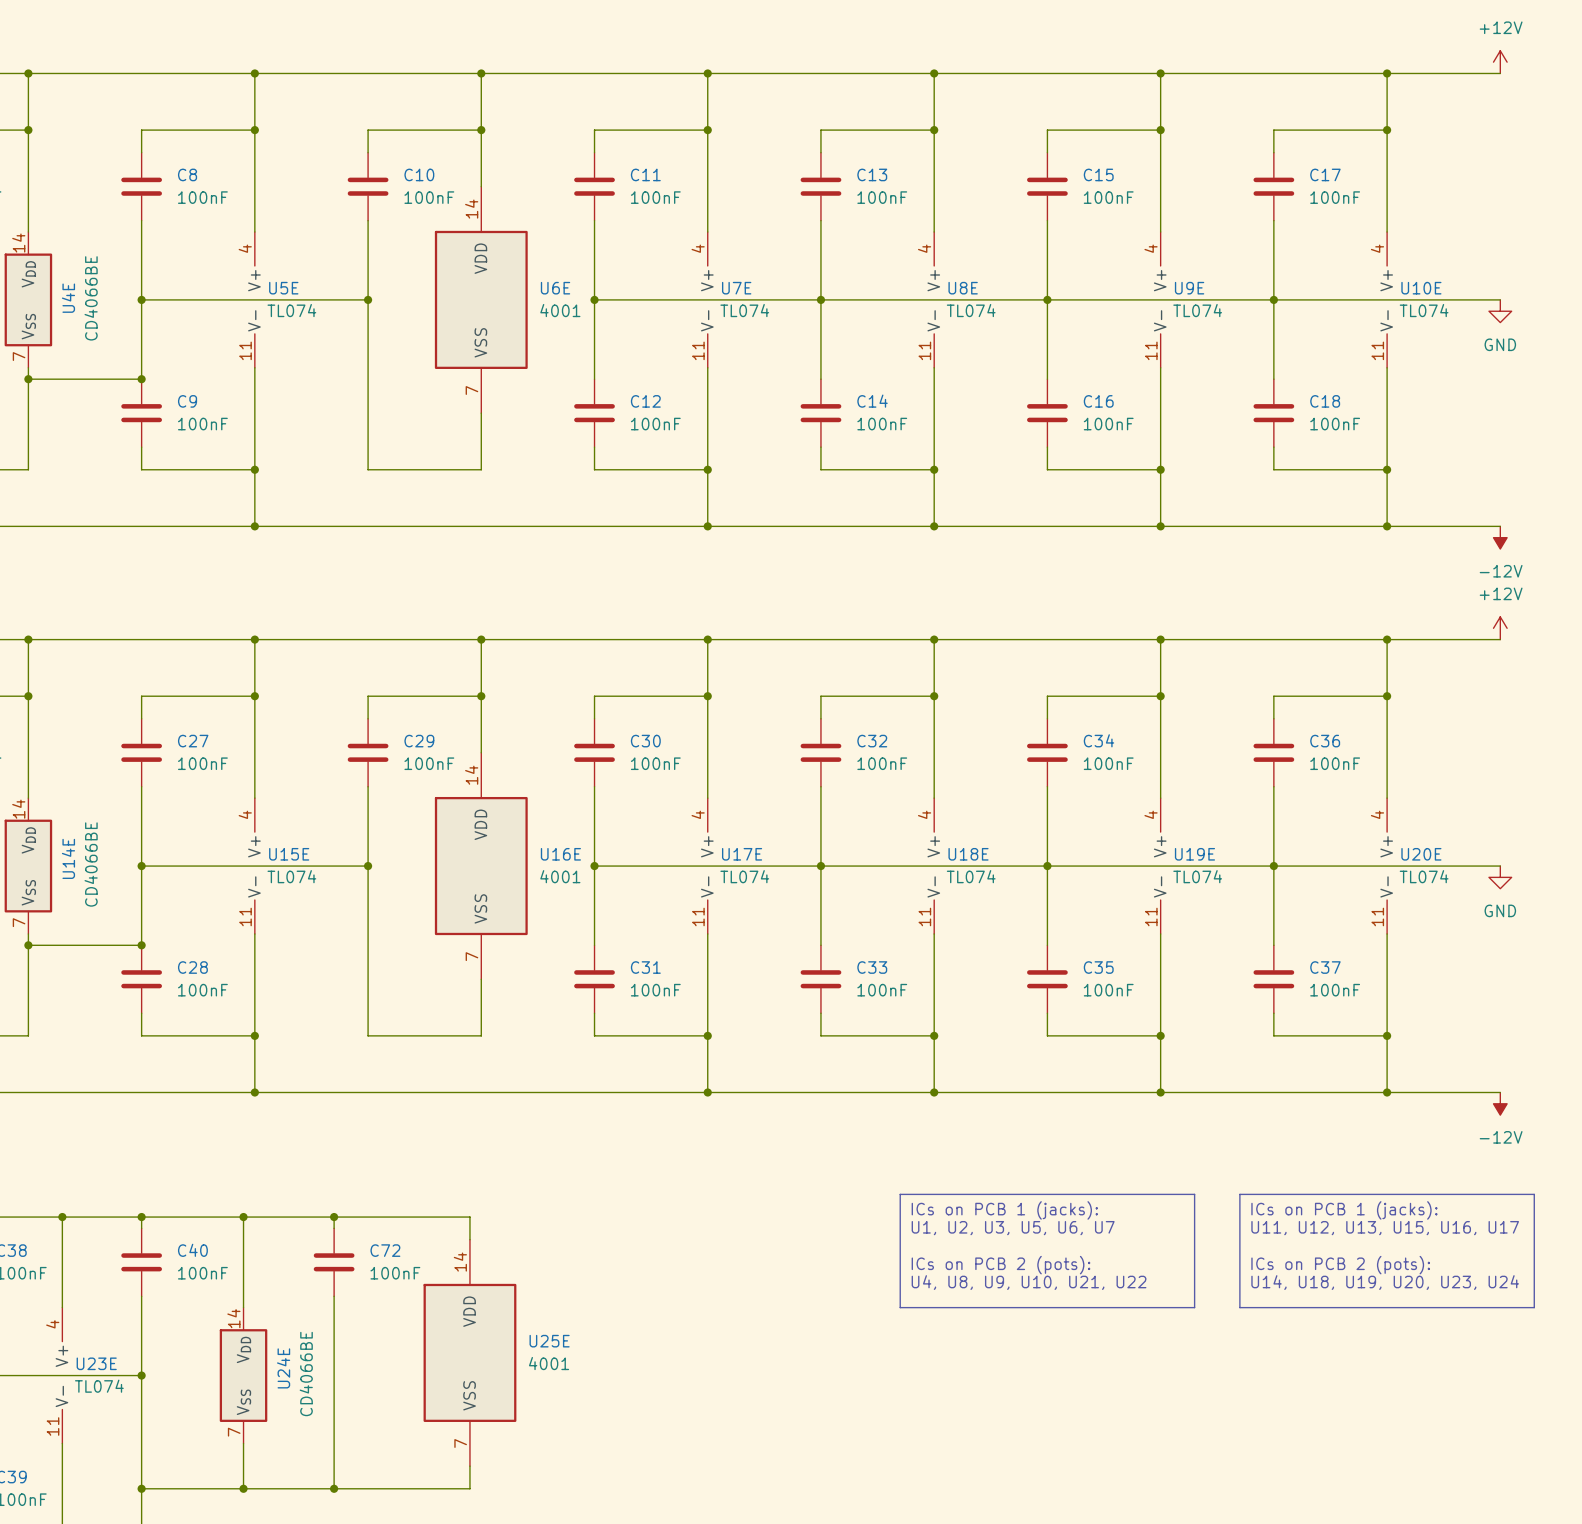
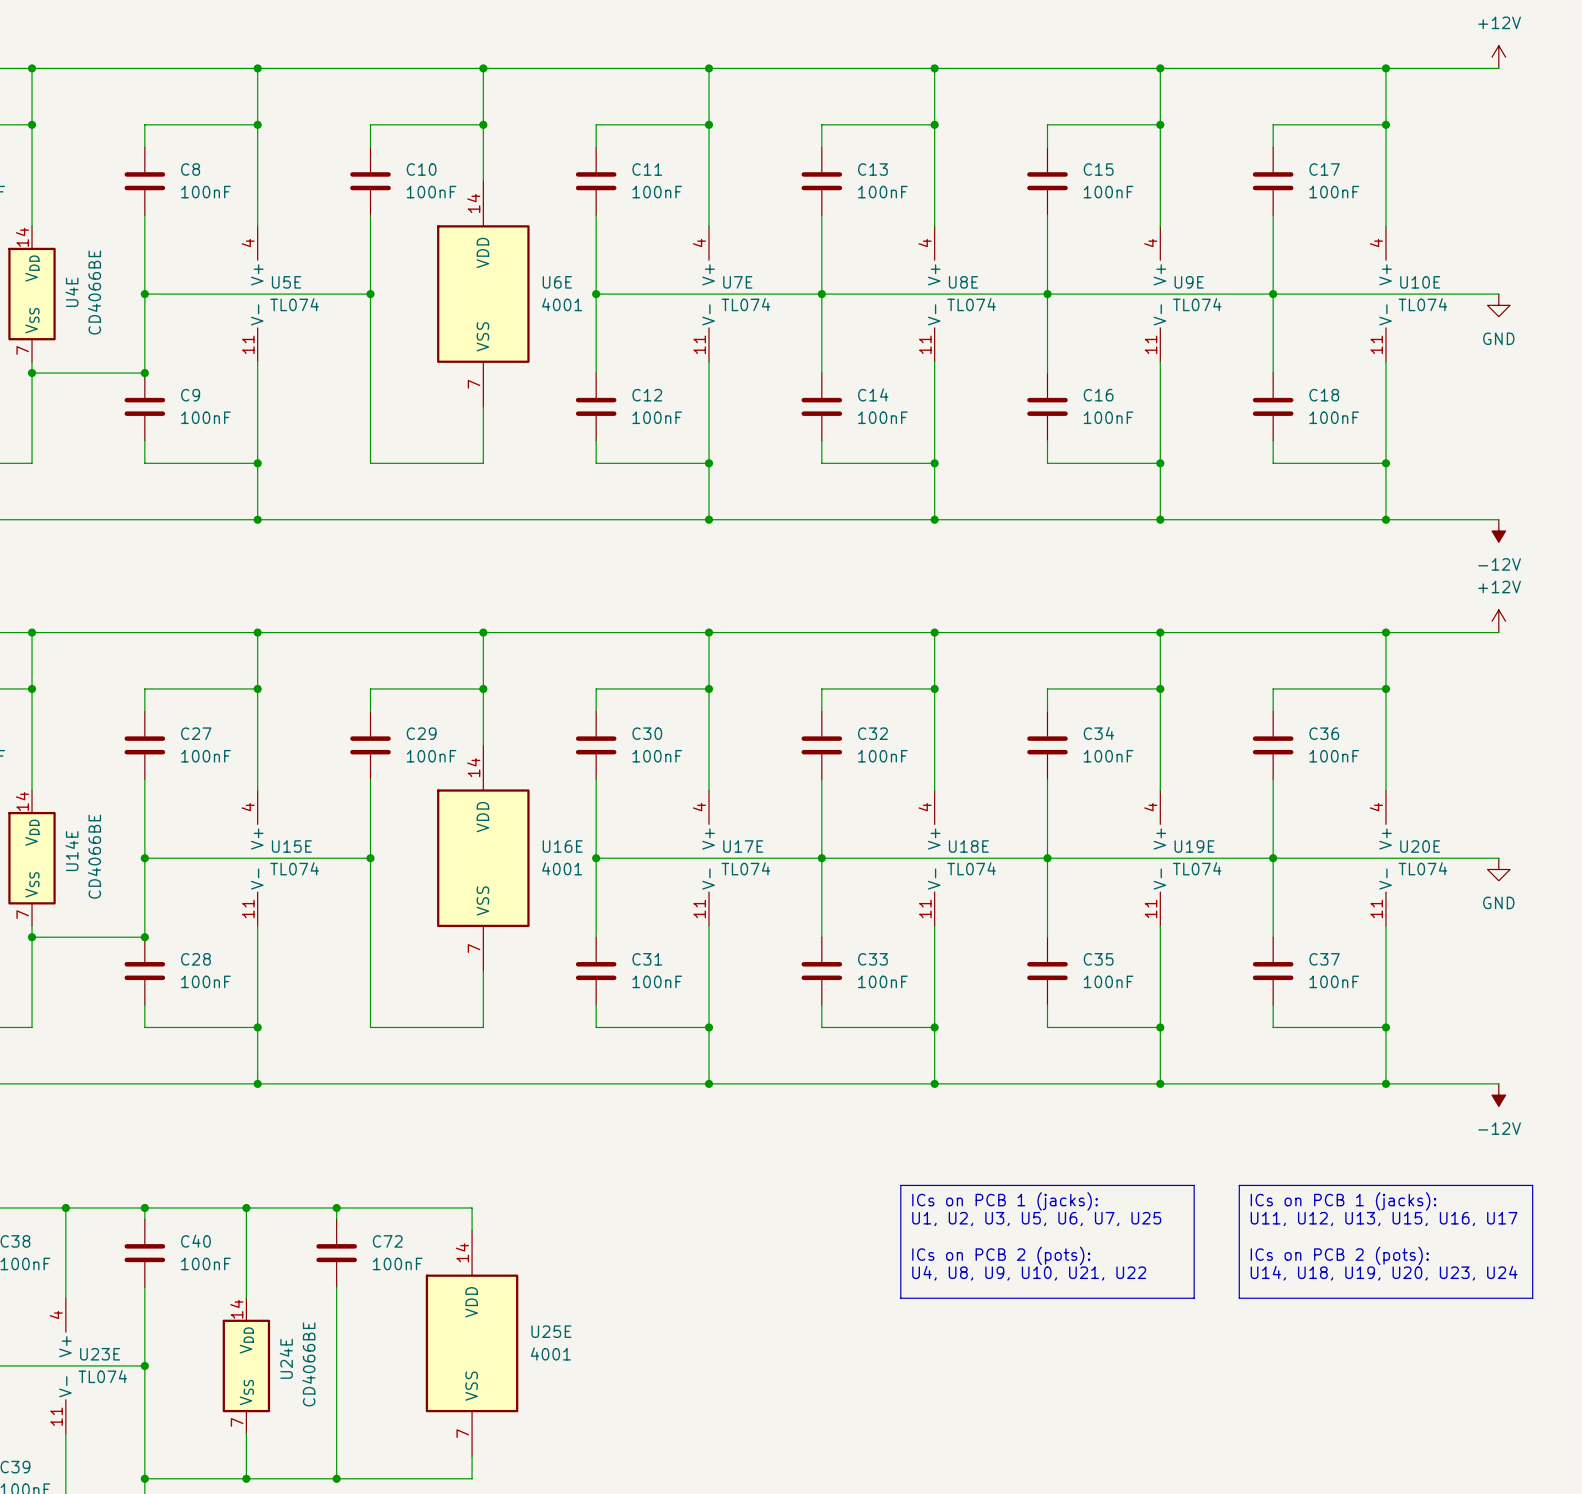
text: U1, U2, U3, U5, U6, U7 (1013, 1228) -> U1, U2, U3, U5, U6, U7, U25 (1036, 1219)

